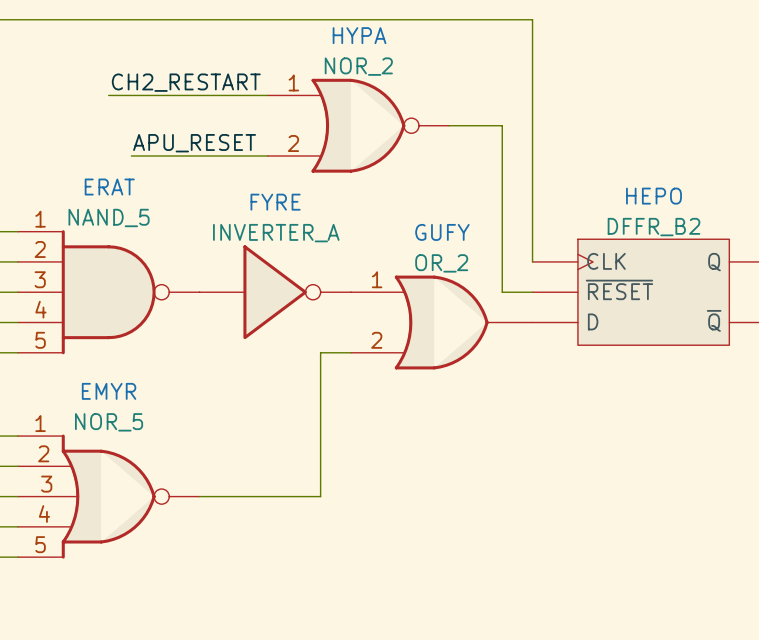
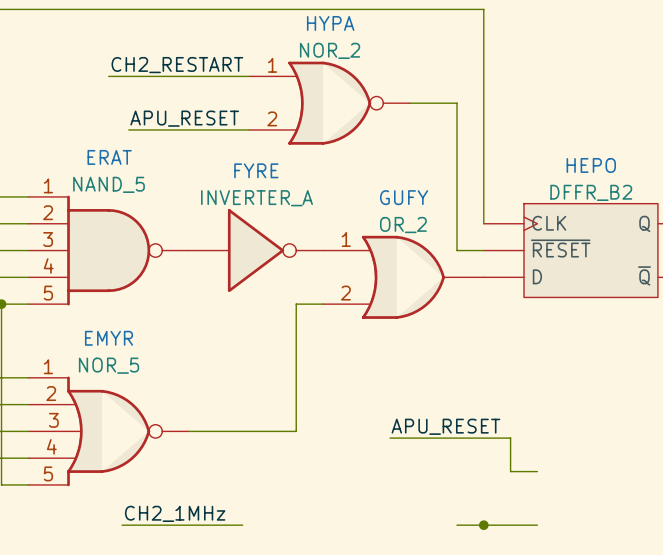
label: none -> APU_RESET (445, 426)
wire: none -> (390, 438) (510, 438) (510, 471) (537, 471)
label: none -> CH2_1MHz (175, 513)
wire: none -> (122, 525) (242, 525)
wire: none -> (457, 525) (537, 525)
junction: none -> (483, 525)

